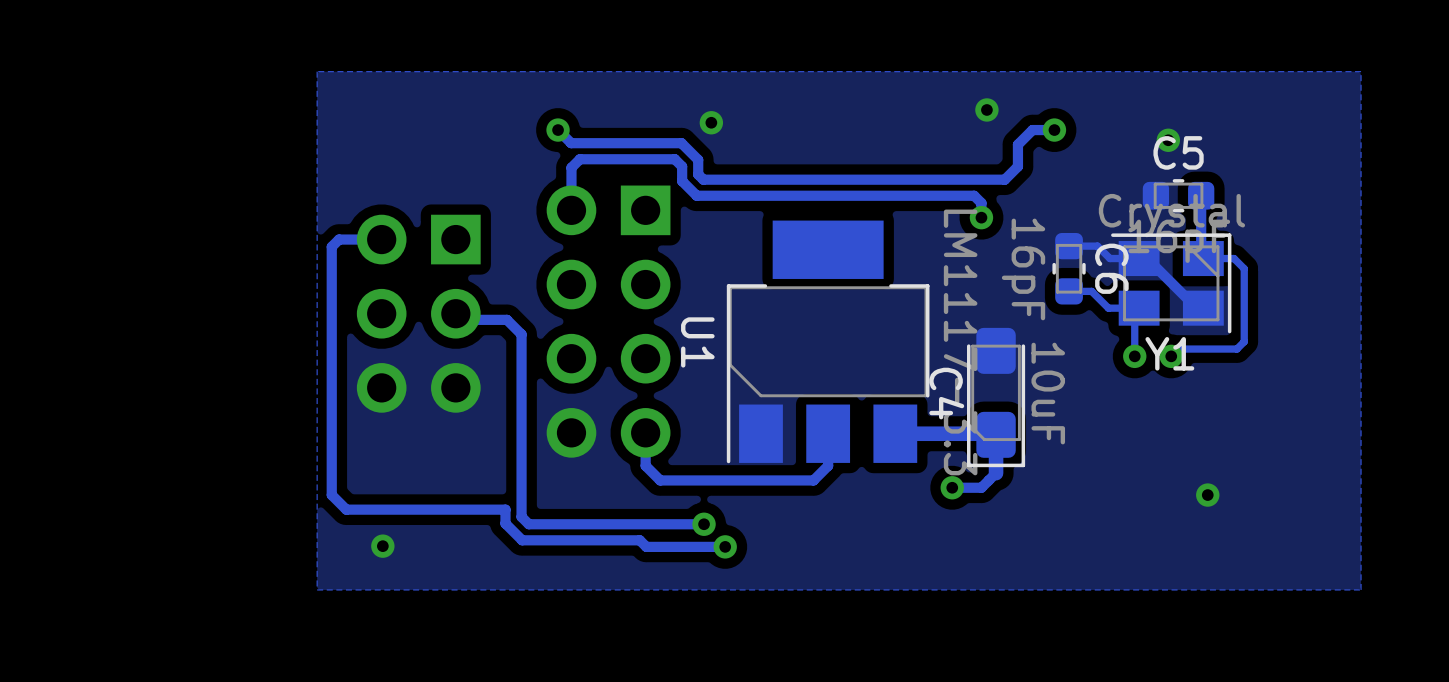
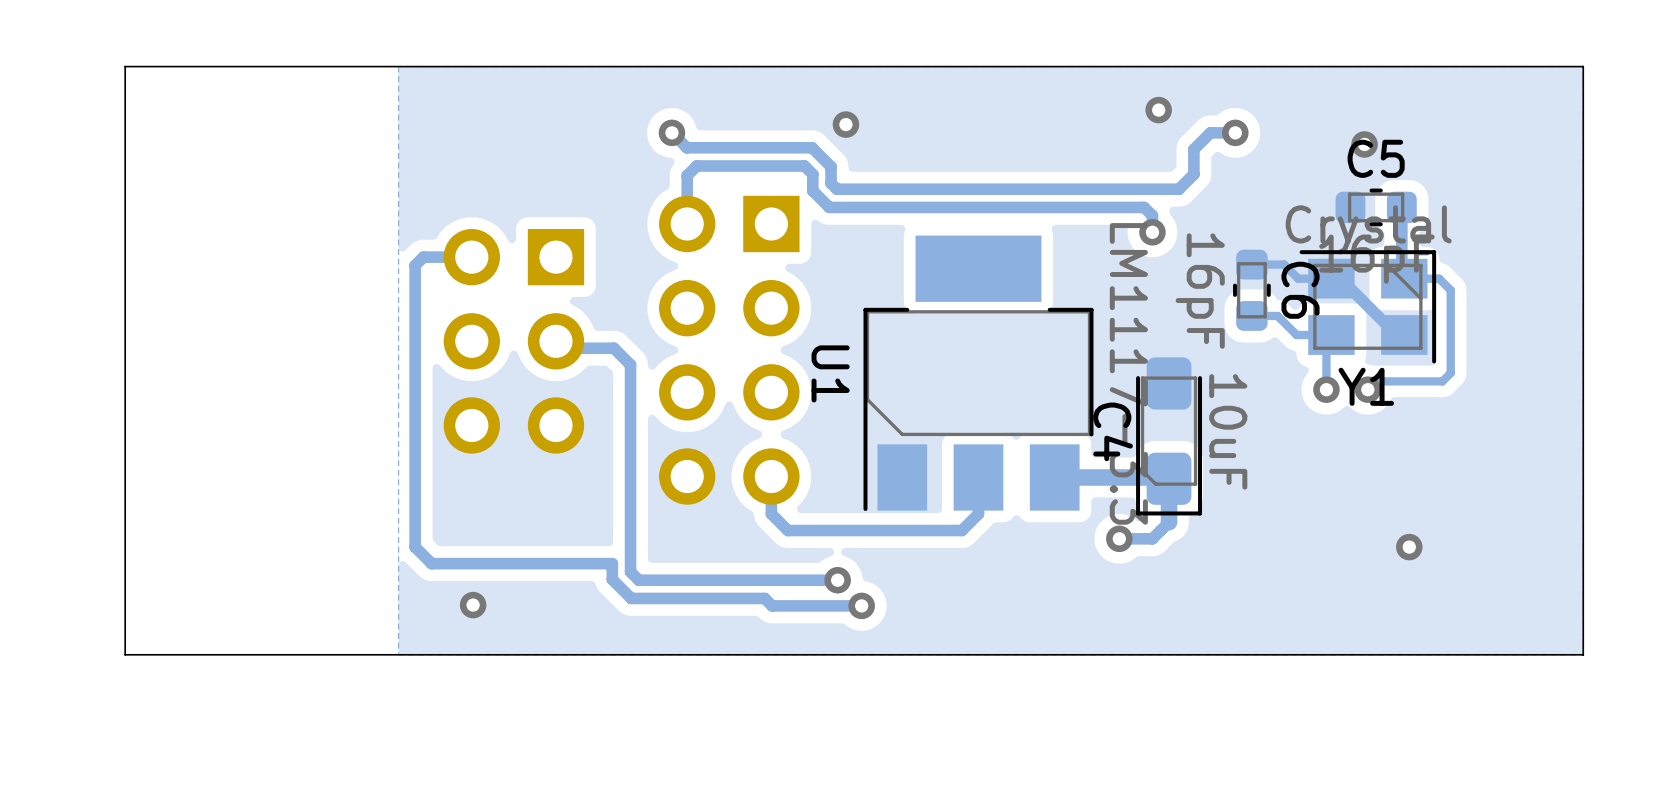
board edge: none -> (1583, 66) (1583, 654) (125, 654) (125, 66) (1583, 66)

